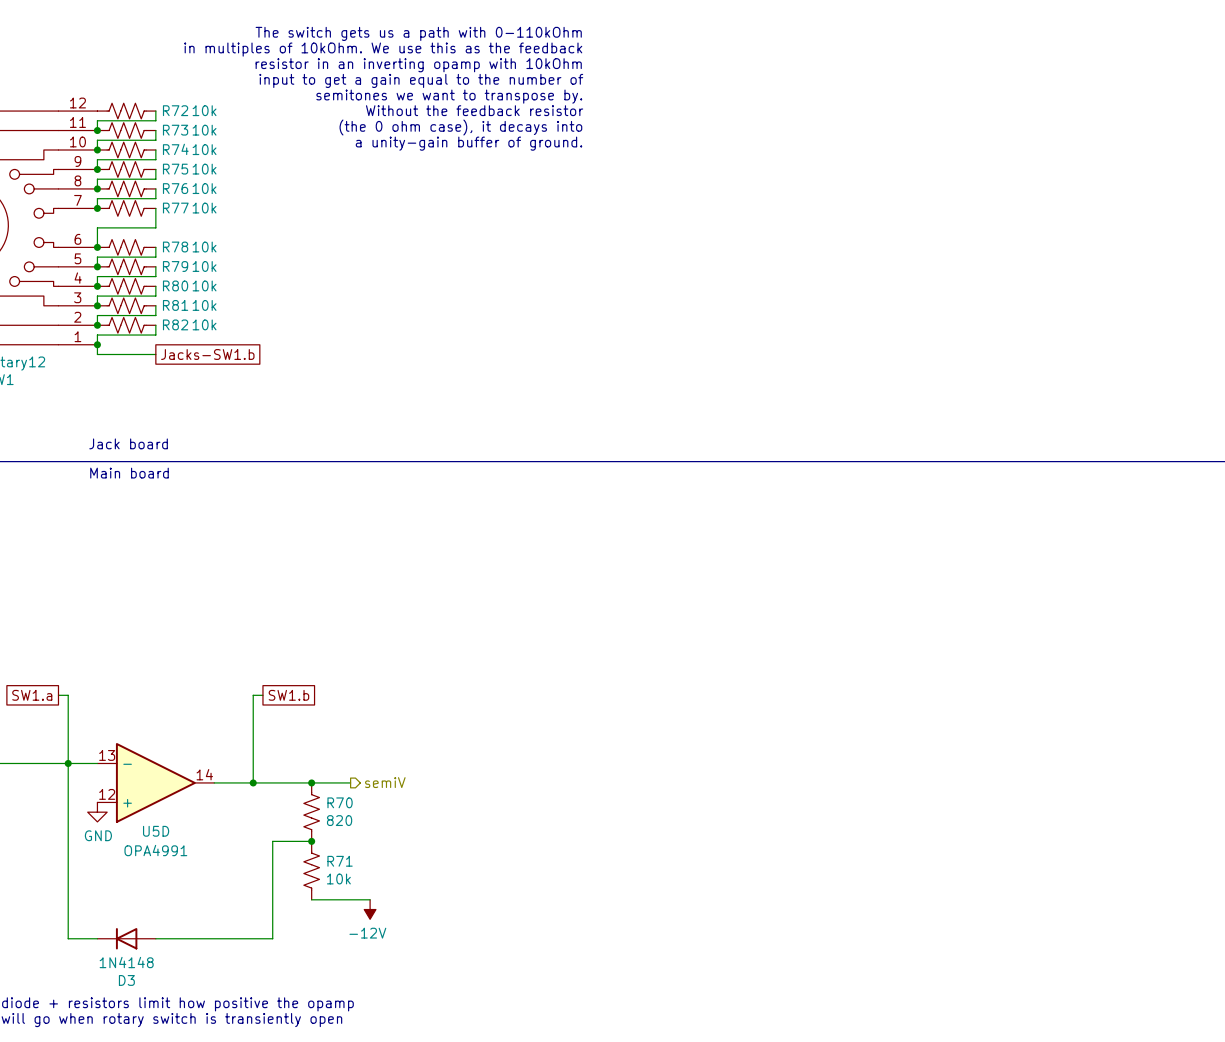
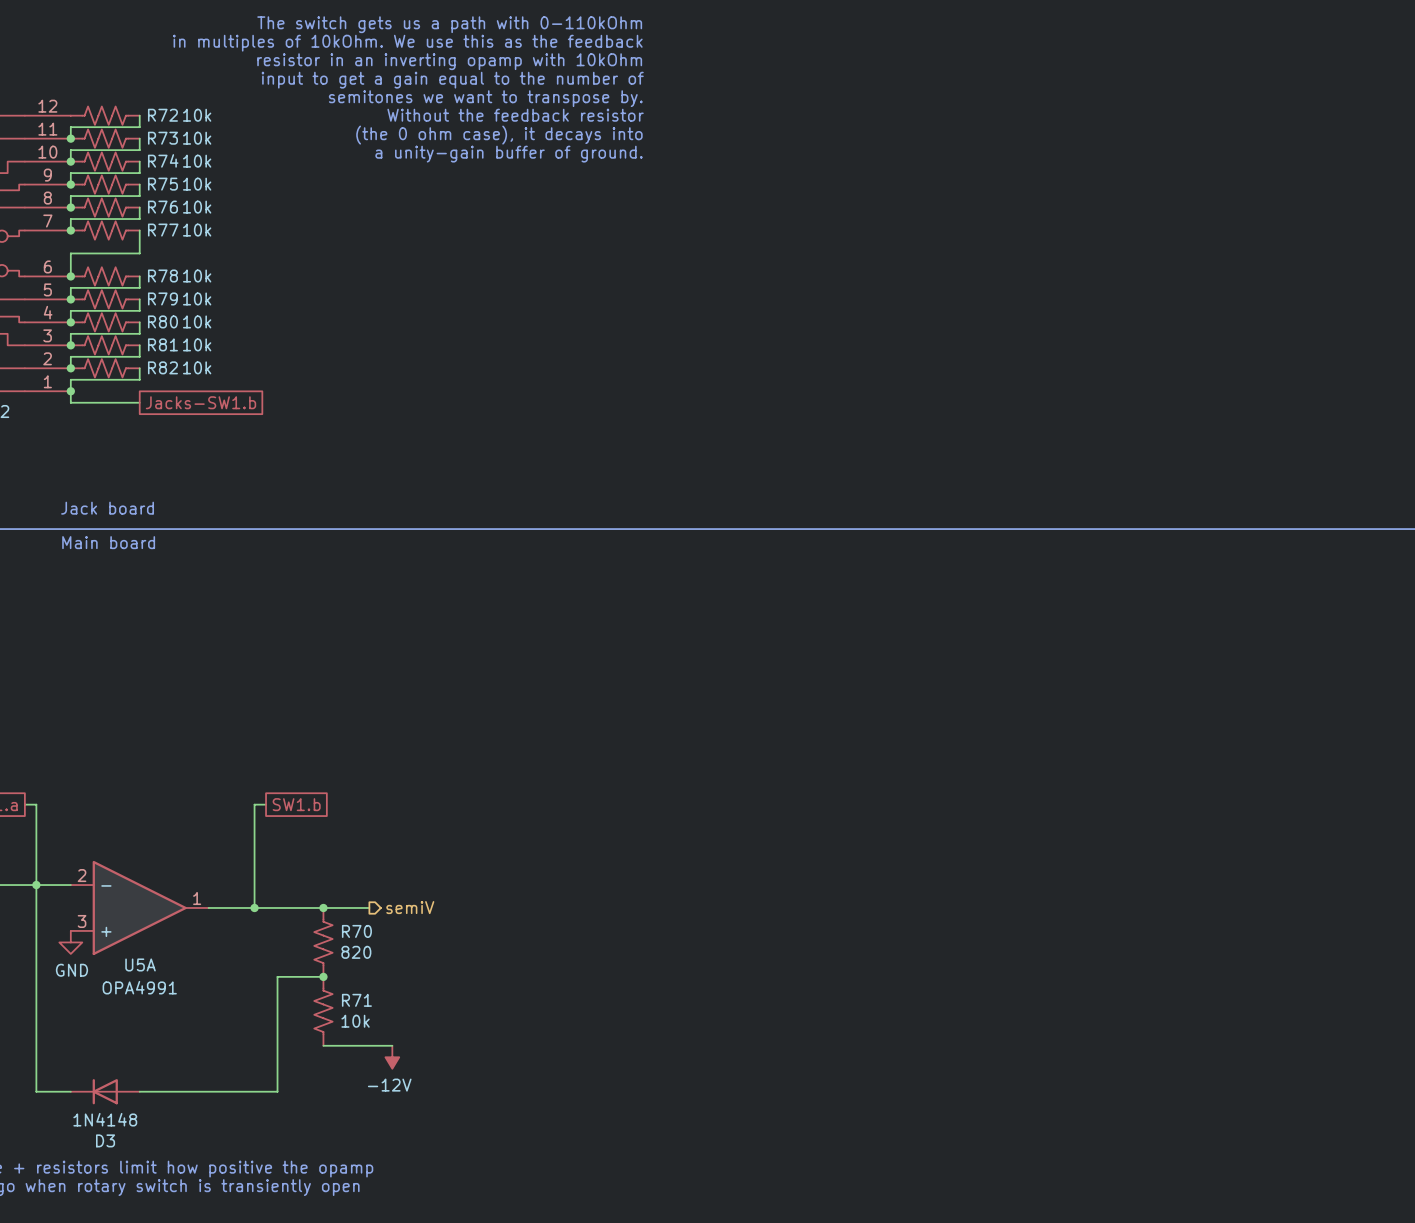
U5D pin number: 13 (107, 755) -> 2 (82, 875)
U5D pin number: 14 (204, 774) -> 1 (197, 898)
U5D pin number: 12 (107, 794) -> 3 (82, 921)
U5D name: U5D (156, 831) -> U5A (140, 964)

